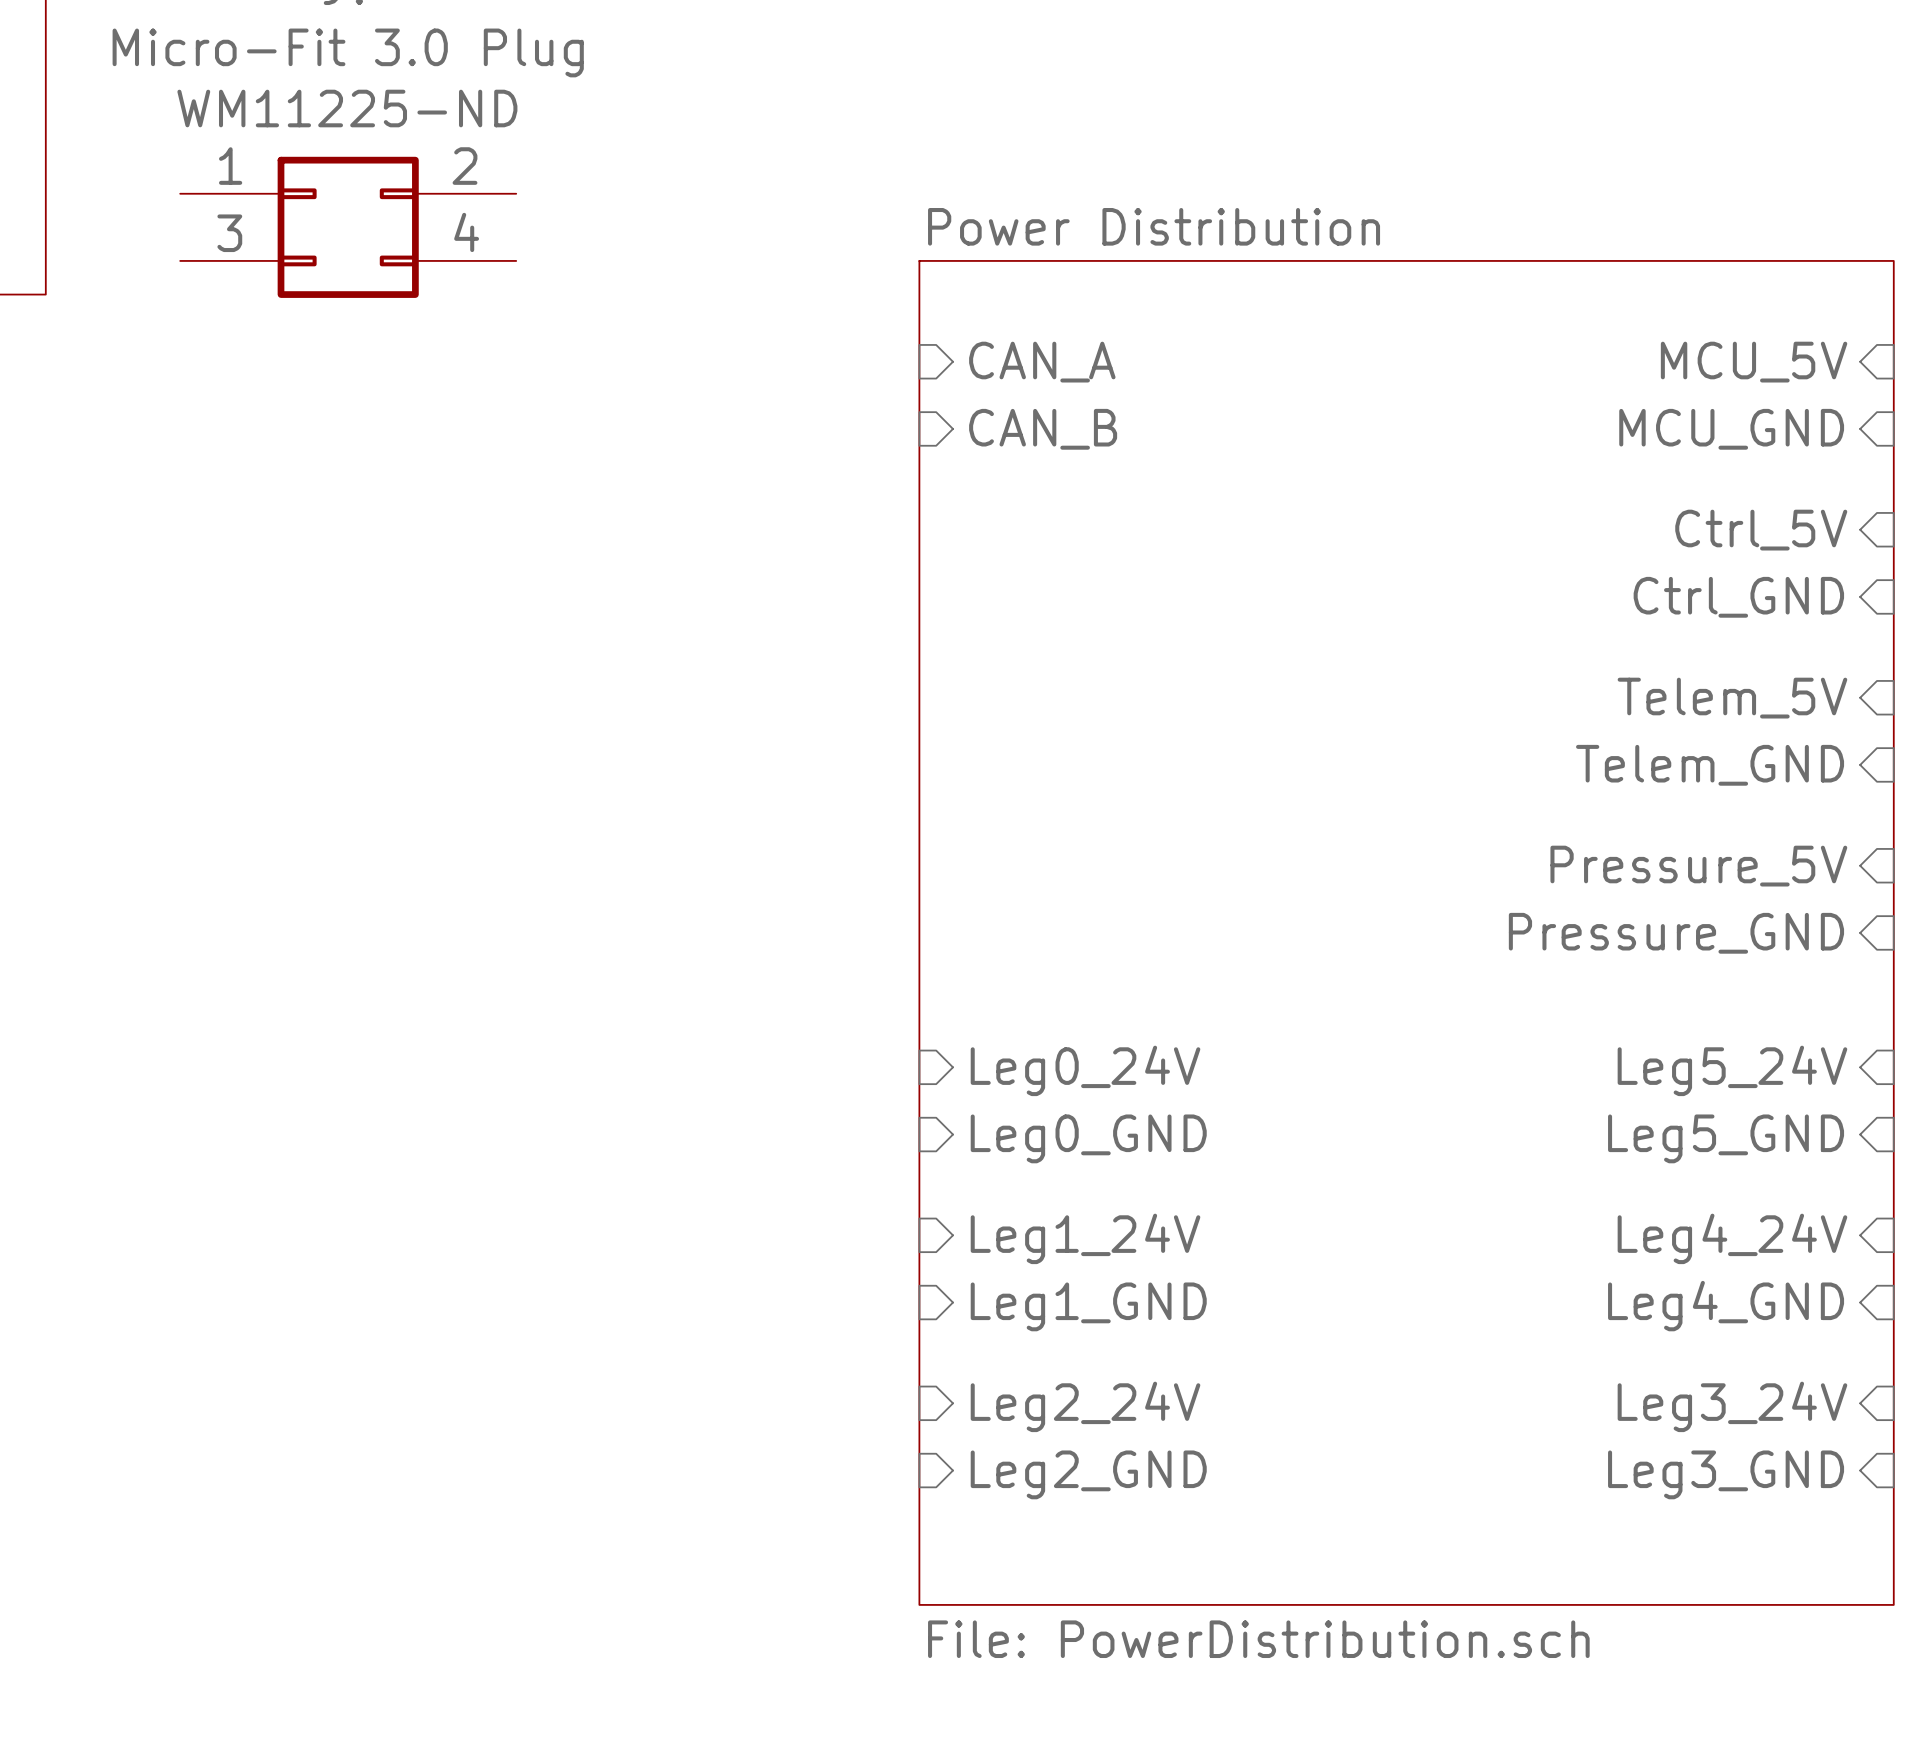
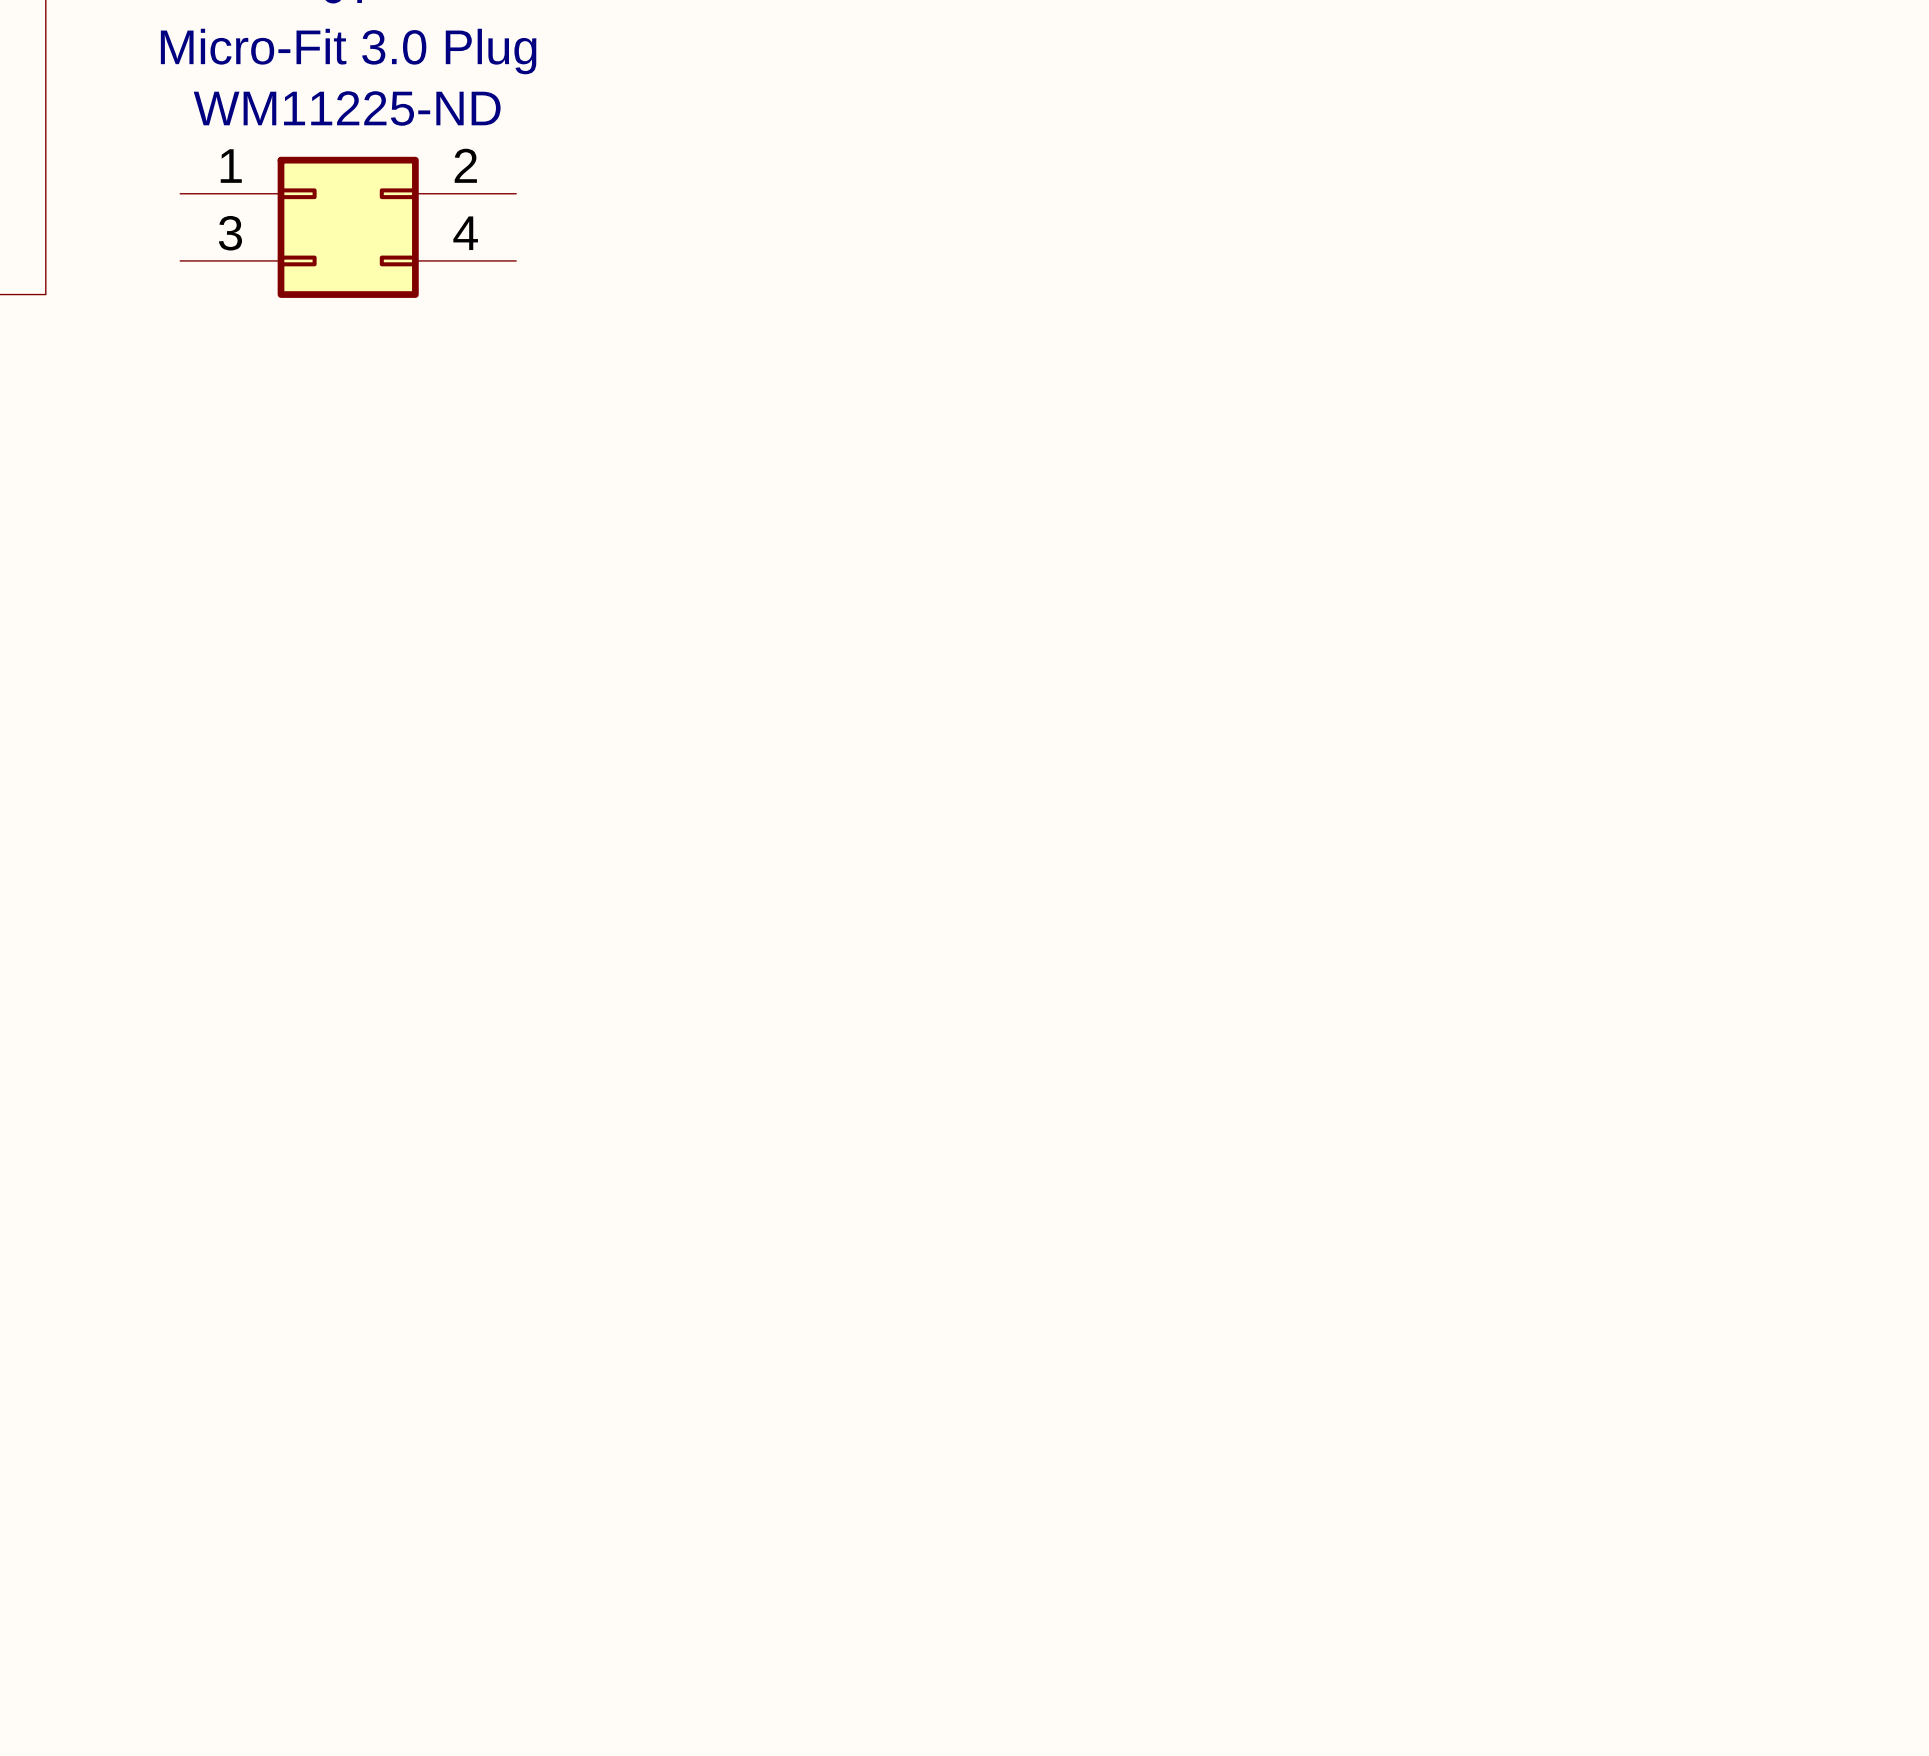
sheet pin: CAN_A (1042, 362) -> none
sheet pin: MCU_5V (1754, 362) -> none
sheet pin: CAN_B (1043, 429) -> none
sheet pin: MCU_GND (1731, 429) -> none
sheet pin: Ctrl_5V (1761, 530) -> none
sheet pin: Ctrl_GND (1738, 597) -> none
sheet pin: Telem_5V (1732, 698) -> none
sheet pin: Telem_GND (1710, 765) -> none
sheet pin: Pressure_5V (1698, 866) -> none
sheet Power Distribution: File: PowerDistribution.sch (1406, 932) -> none
sheet pin: Pressure_GND (1676, 933) -> none
sheet pin: Leg0_24V (1085, 1070) -> none
sheet pin: Leg5_24V (1732, 1070) -> none
sheet pin: Leg0_GND (1088, 1138) -> none
sheet pin: Leg5_GND (1726, 1138) -> none
sheet pin: Leg1_24V (1085, 1238) -> none
sheet pin: Leg4_24V (1732, 1238) -> none
sheet pin: Leg1_GND (1088, 1306) -> none
sheet pin: Leg4_GND (1726, 1306) -> none
sheet pin: Leg2_24V (1085, 1406) -> none
sheet pin: Leg3_24V (1732, 1406) -> none
sheet pin: Leg2_GND (1088, 1474) -> none
sheet pin: Leg3_GND (1726, 1474) -> none

